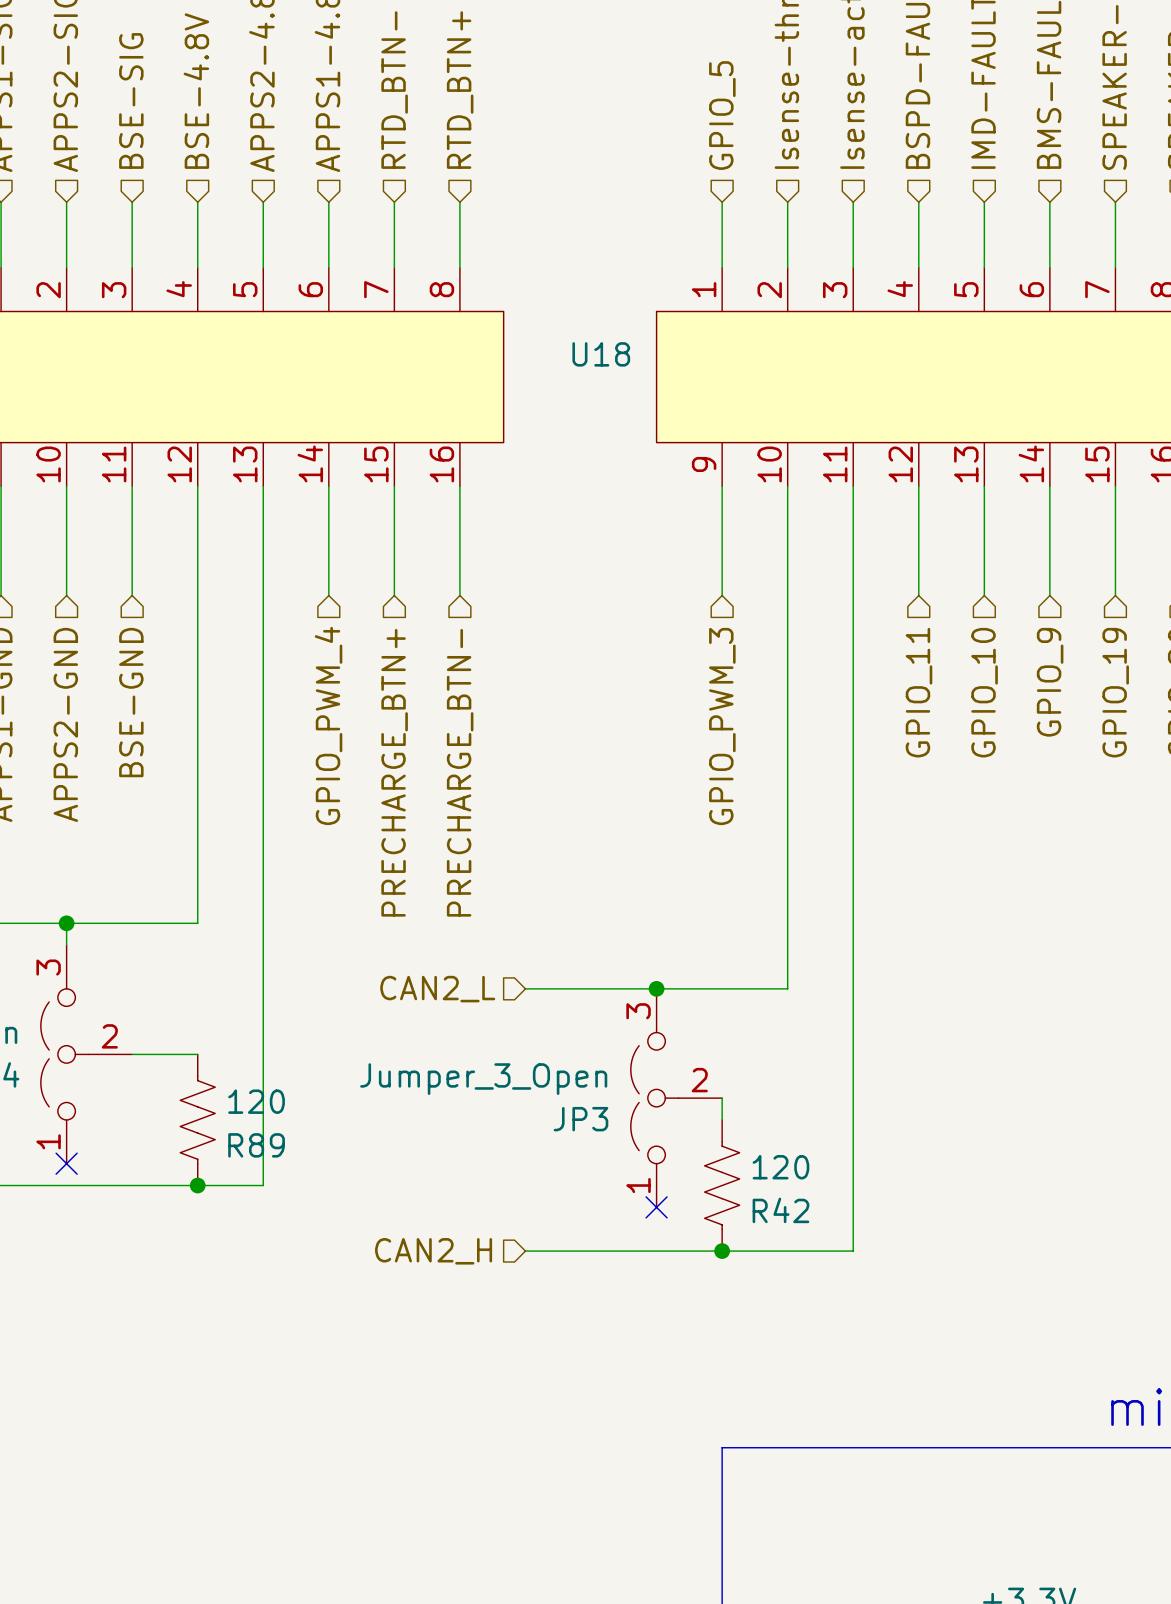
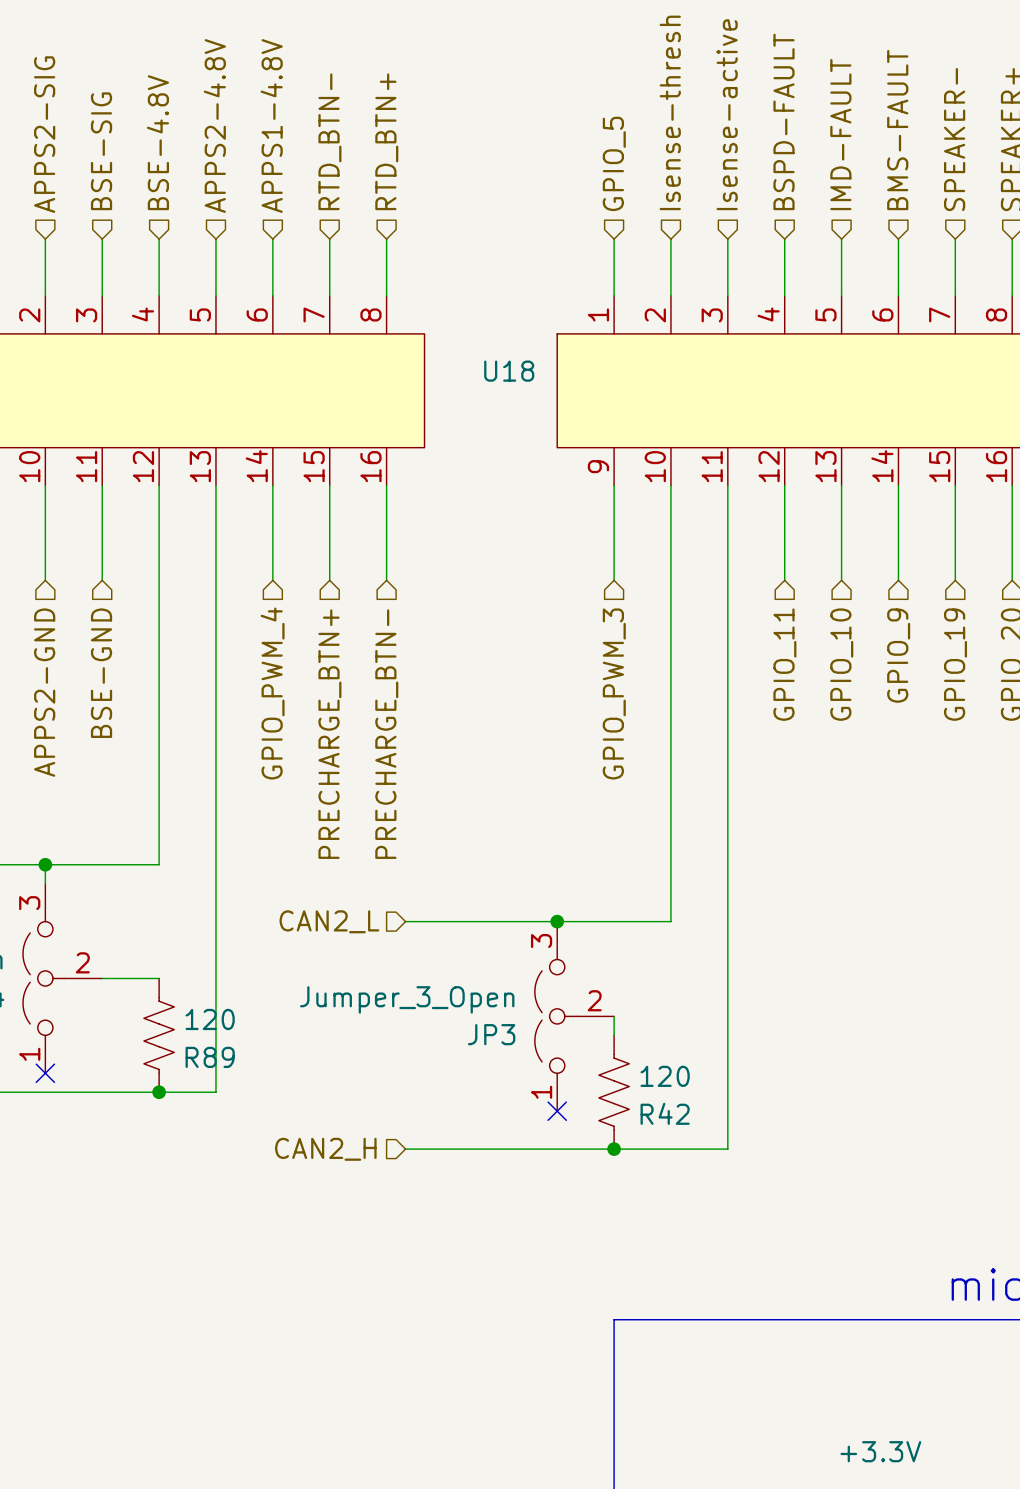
wire: none -> (405, 921) (443, 921)
hierarchical label position: CAN2_L (437, 989) -> CAN2_L (329, 921)
hierarchical label position: CAN2_H (433, 1251) -> CAN2_H (325, 1149)
wire: none -> (405, 1149) (443, 1149)

